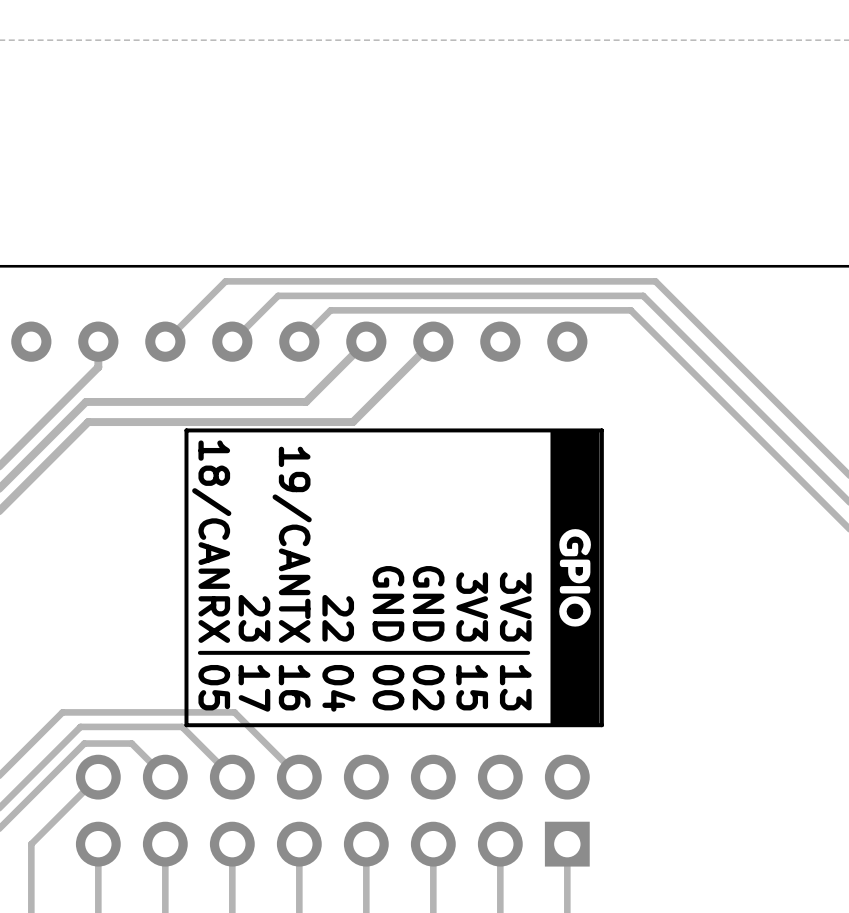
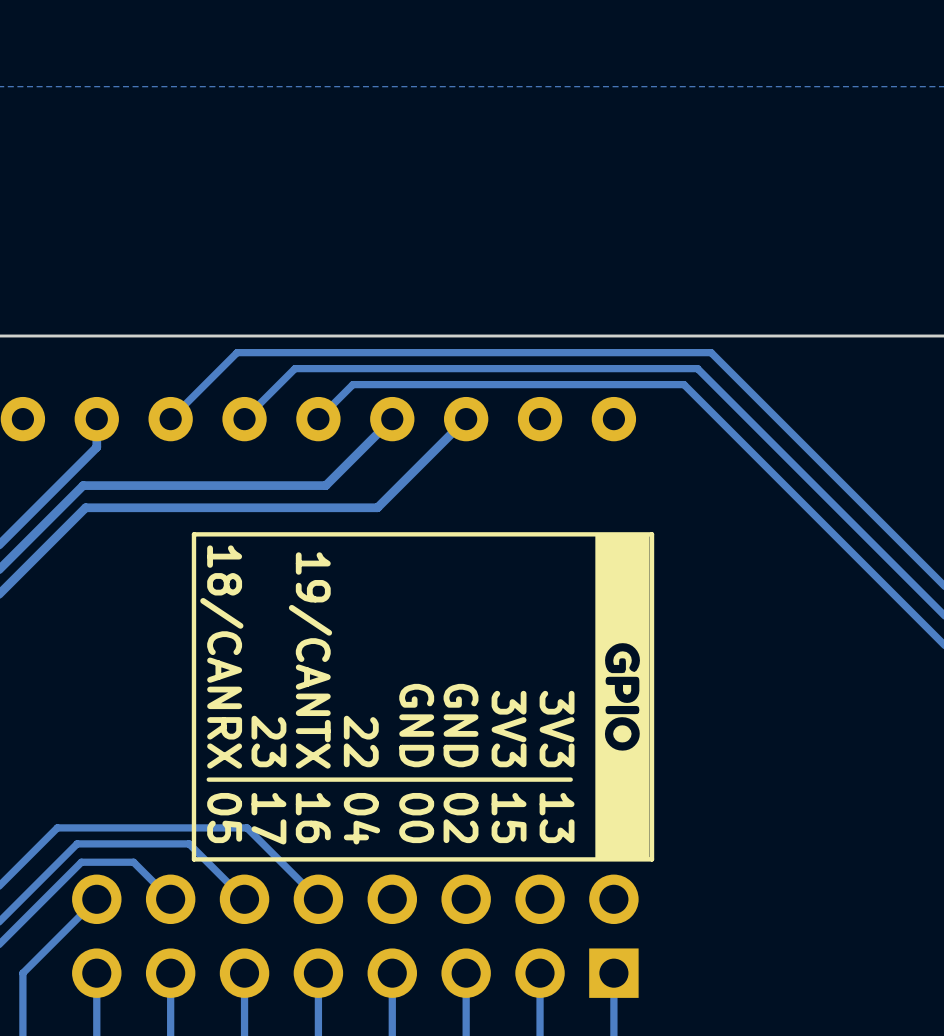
line: (601, 446) (601, 430) (186, 430) (186, 446) -> (652, 534) (193, 534)
text position: 18/CANRX (211, 541) -> 18/CANRX (221, 657)
text position: 19/CANTX (292, 544) -> 19/CANTX (310, 660)
drawing position: (575, 577) -> (622, 696)
text position: GND (388, 603) -> GND (416, 725)
text position: GND (428, 603) -> GND (461, 725)
text position: 3V3 (472, 606) -> 3V3 (509, 729)
text position: 3V3 (515, 606) -> 3V3 (557, 729)
text position: 23 (254, 618) -> 23 (268, 741)
text position: 22 (338, 618) -> 22 (361, 741)
line: (528, 652) (199, 652) -> (570, 779) (208, 779)
text position: 05 (214, 687) -> 05 (224, 818)
text position: 16 (294, 687) -> 16 (313, 818)
text position: 00 (388, 687) -> 00 (416, 818)
text position: 02 (428, 687) -> 02 (461, 818)
text position: 15 (472, 687) -> 15 (509, 818)
text position: 13 (515, 687) -> 13 (557, 818)
text position: 17 (254, 688) -> 17 (268, 818)
text position: 04 (338, 688) -> 04 (361, 818)
line: (601, 725) (186, 725) -> (652, 842) (652, 859) (193, 859) (193, 842)

